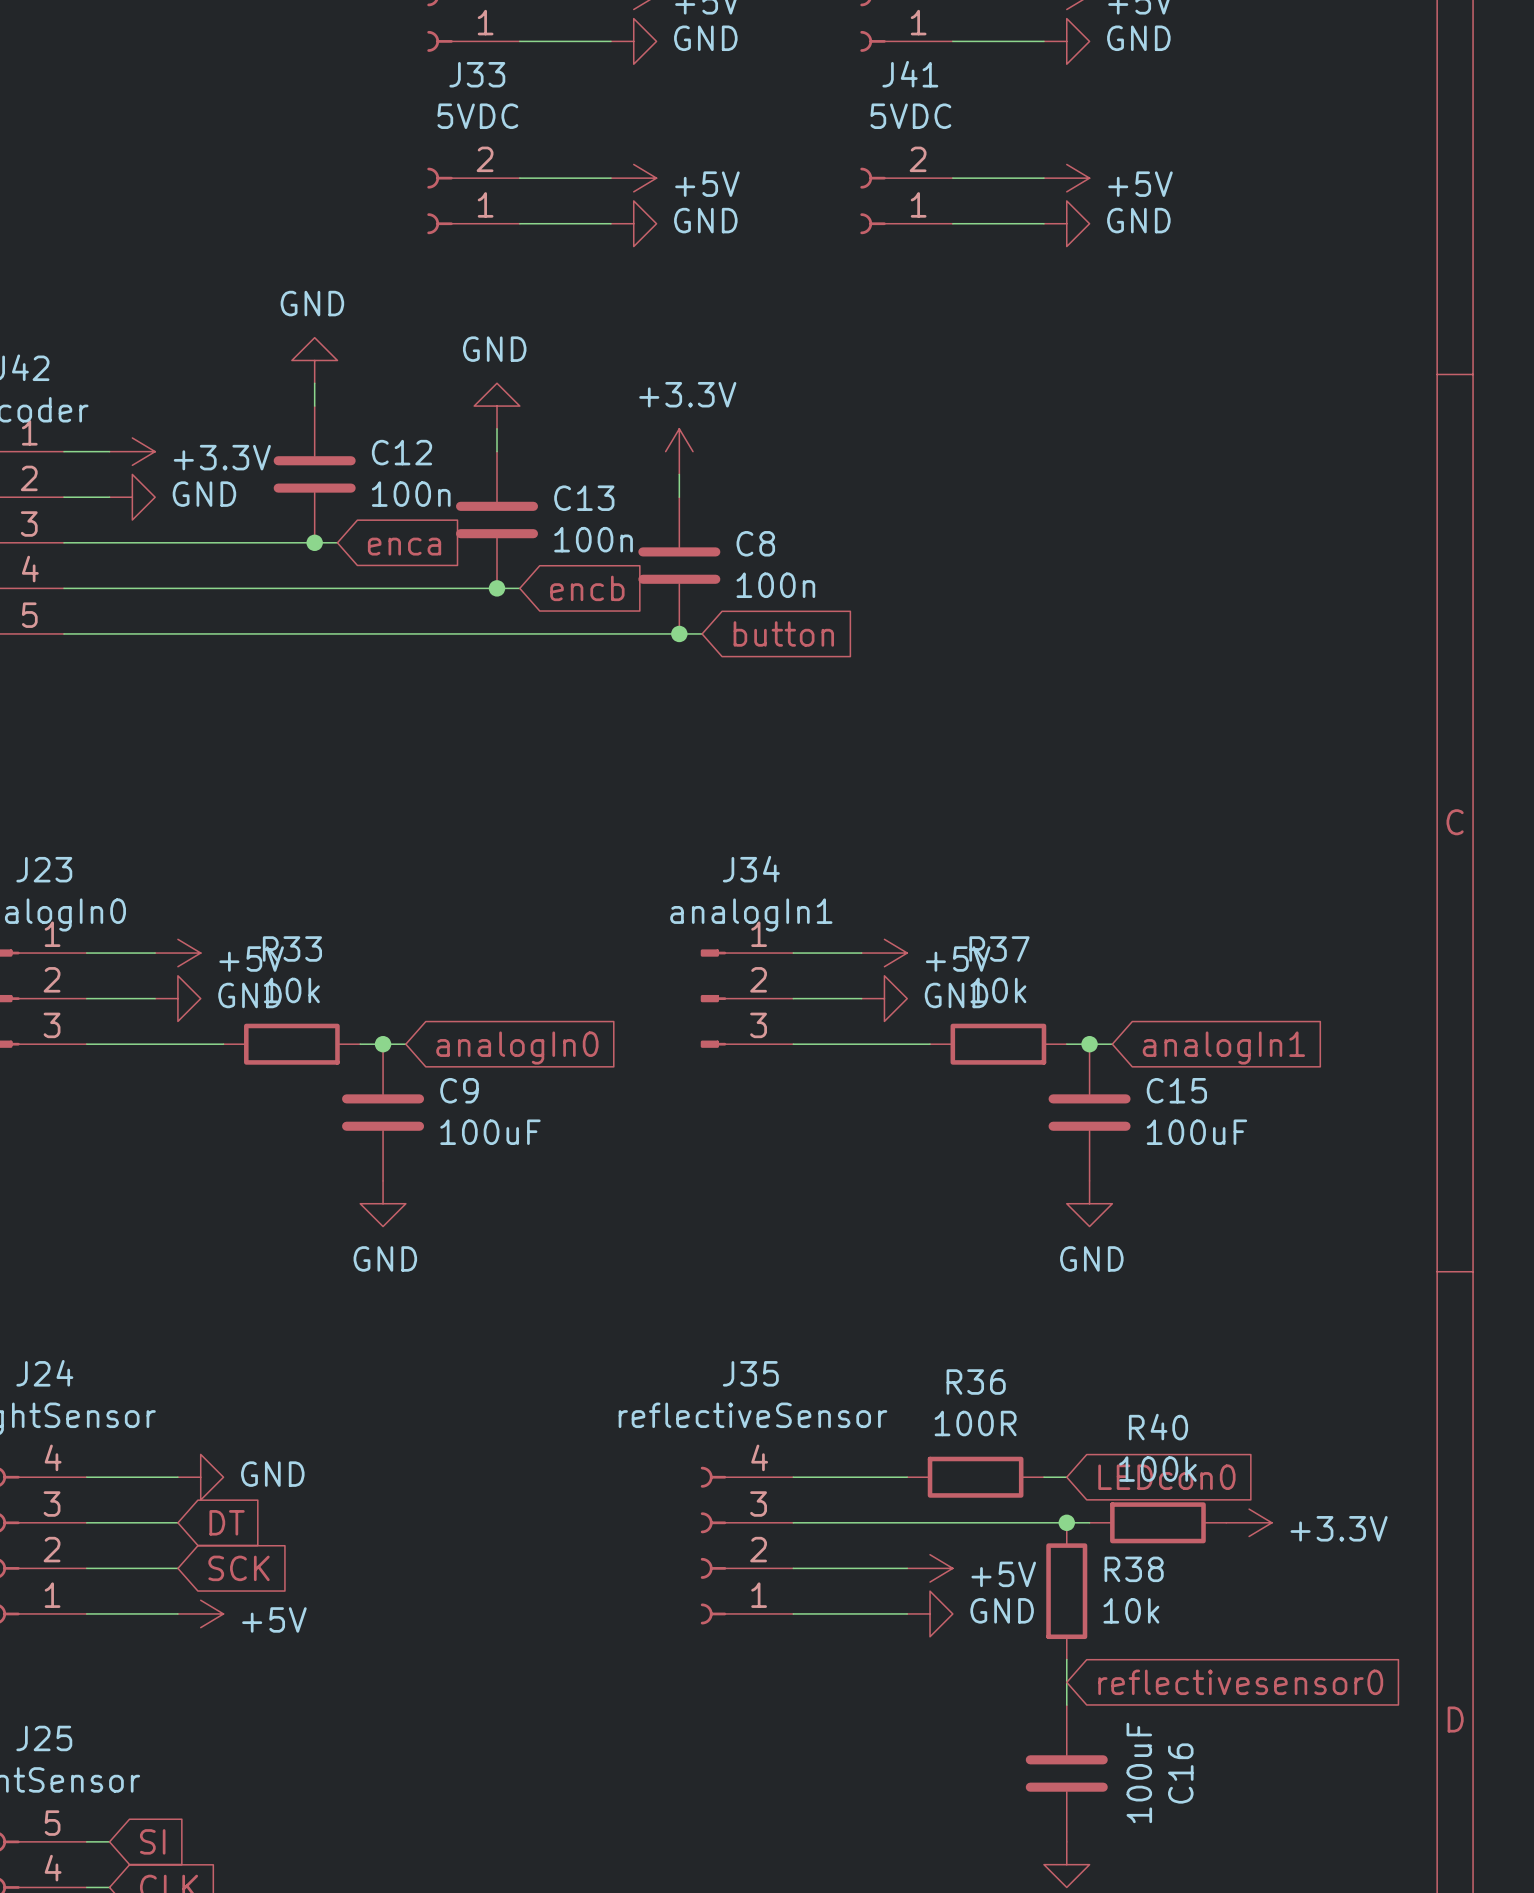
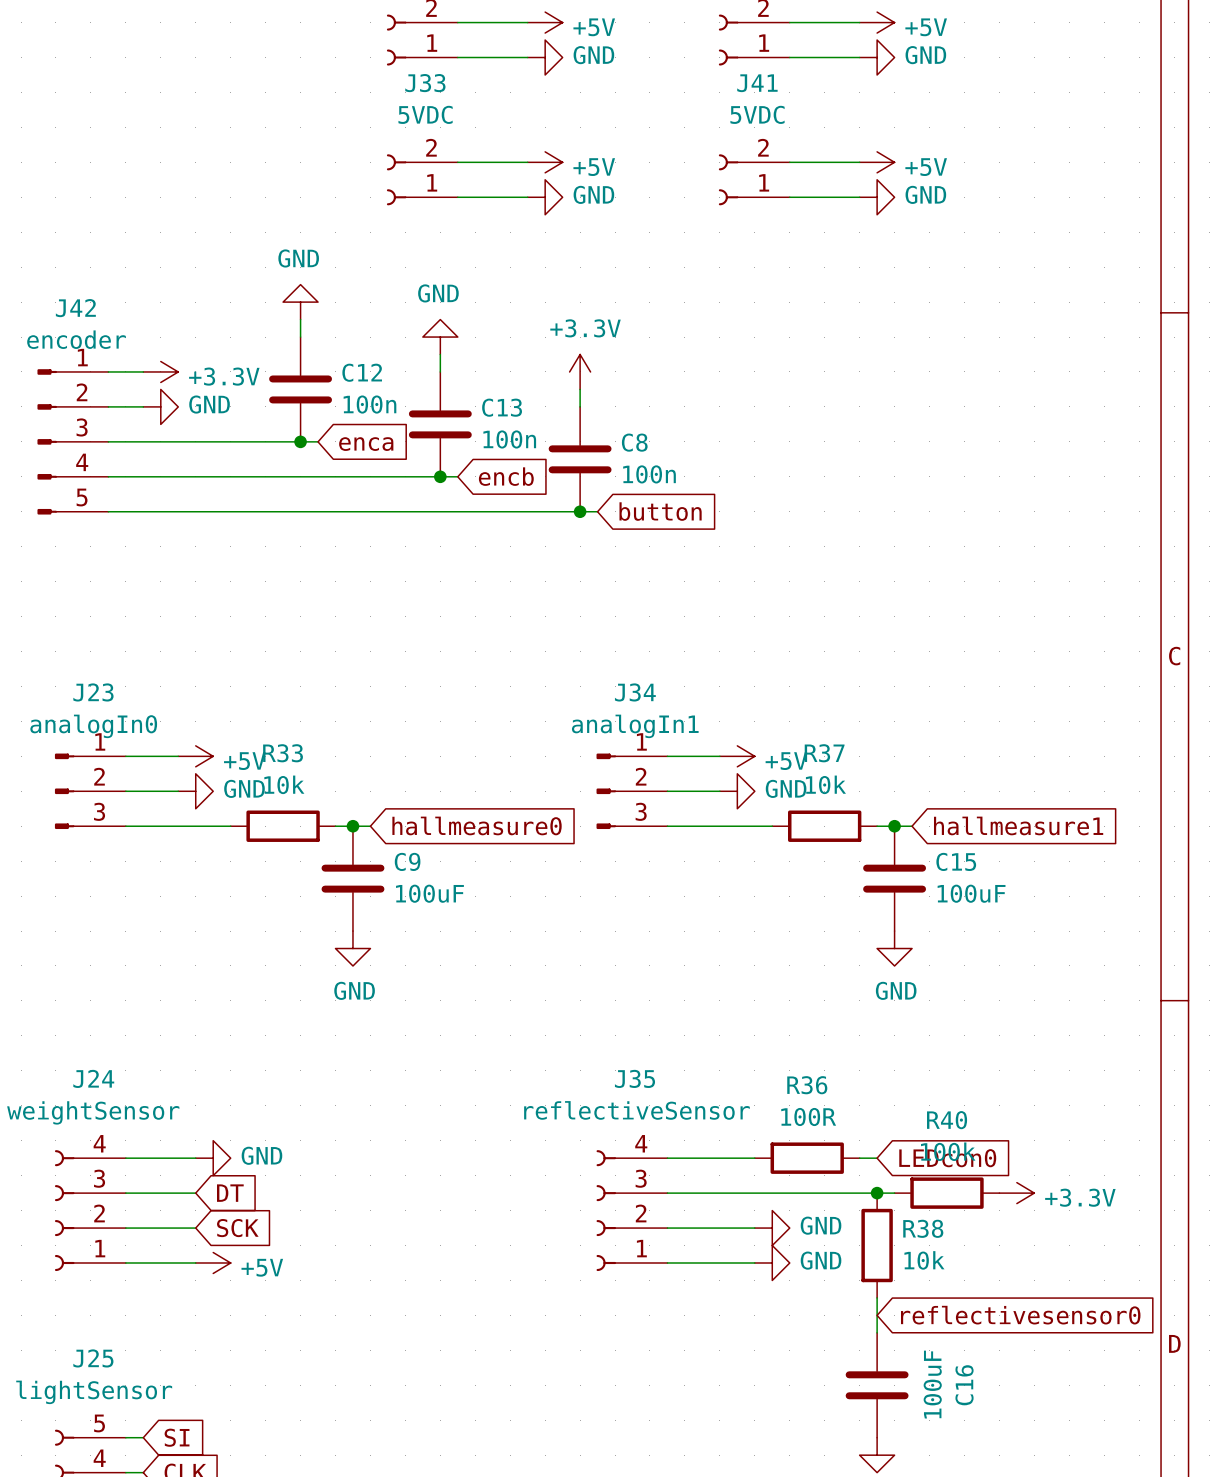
global label: analogIn0 (517, 1048) -> hallmeasure0 (477, 825)
global label: analogIn1 (1223, 1048) -> hallmeasure1 (1018, 825)
power symbol: +5V (930, 1568) -> GND (772, 1228)

